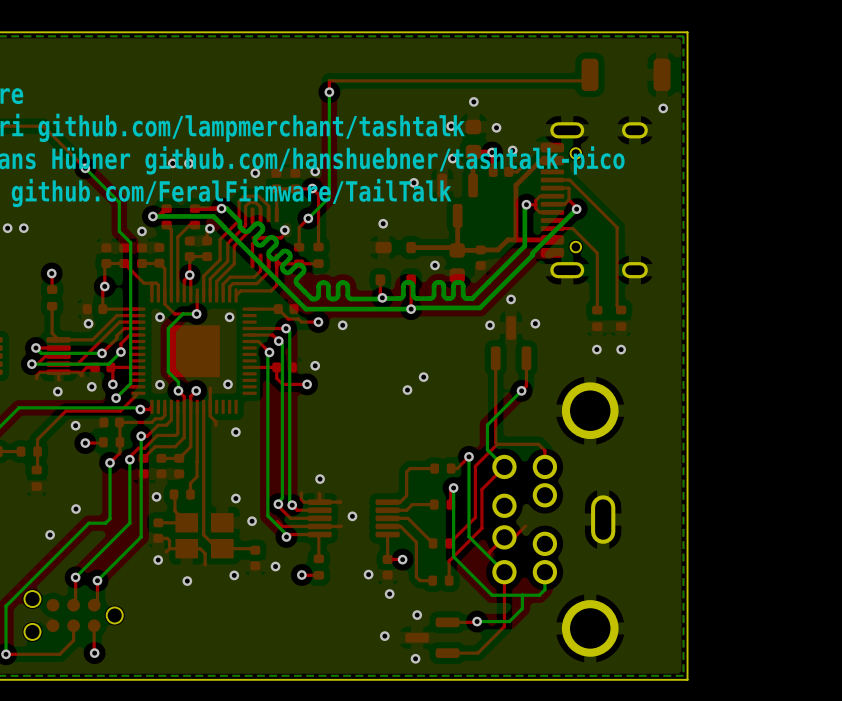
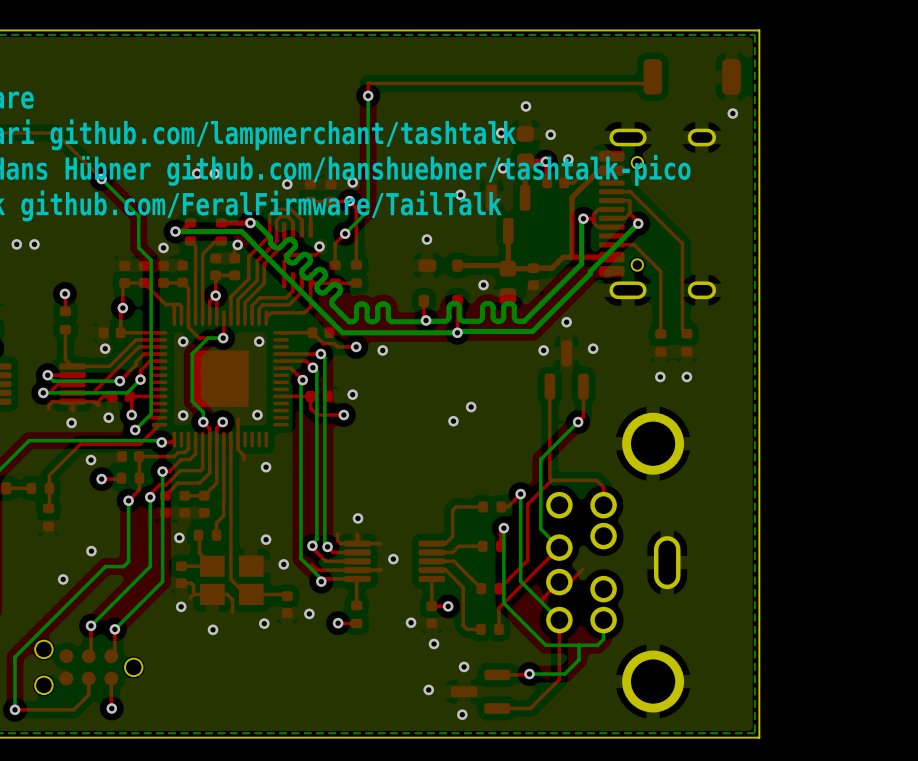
bottom track: (487, 449) (504, 466) -> (540, 486) (540, 529) (559, 547)
top track: (504, 466) (481, 489) (481, 528) -> (559, 547) (534, 572)

